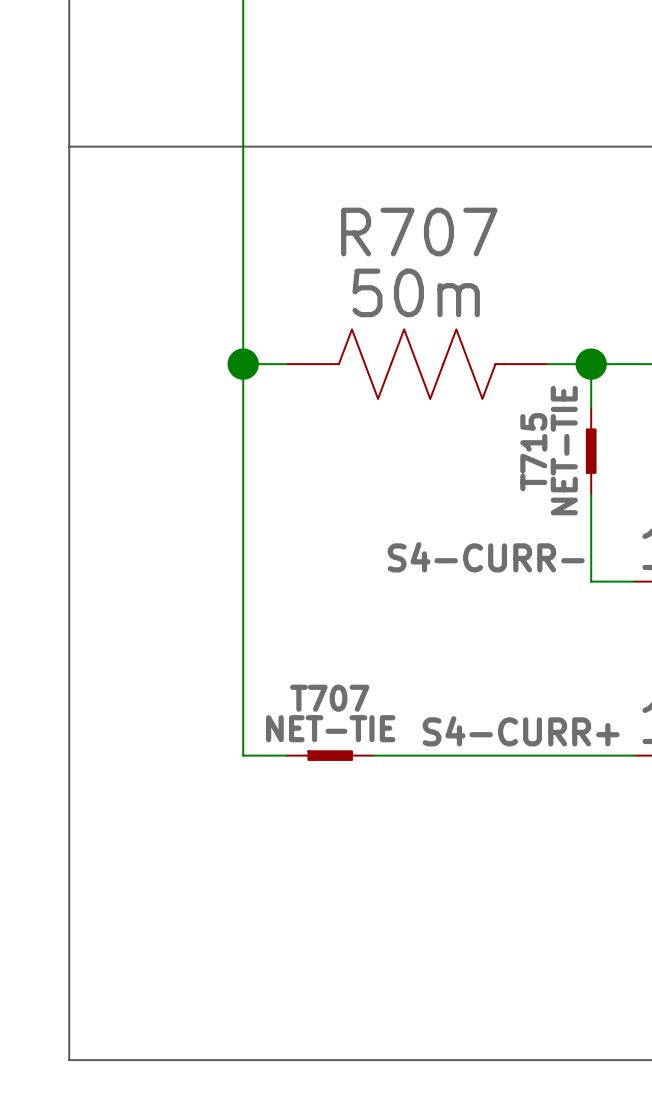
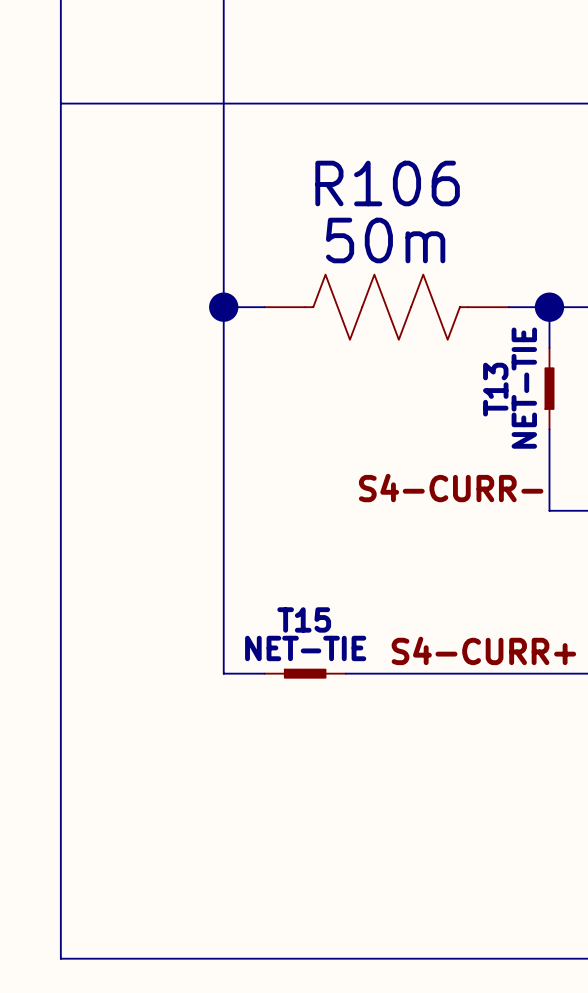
R707 name: R707 (419, 232) -> R106 (387, 183)
T715 name: T715 (533, 452) -> T13 (495, 389)
T707 name: T707 (329, 698) -> T15 (304, 619)

